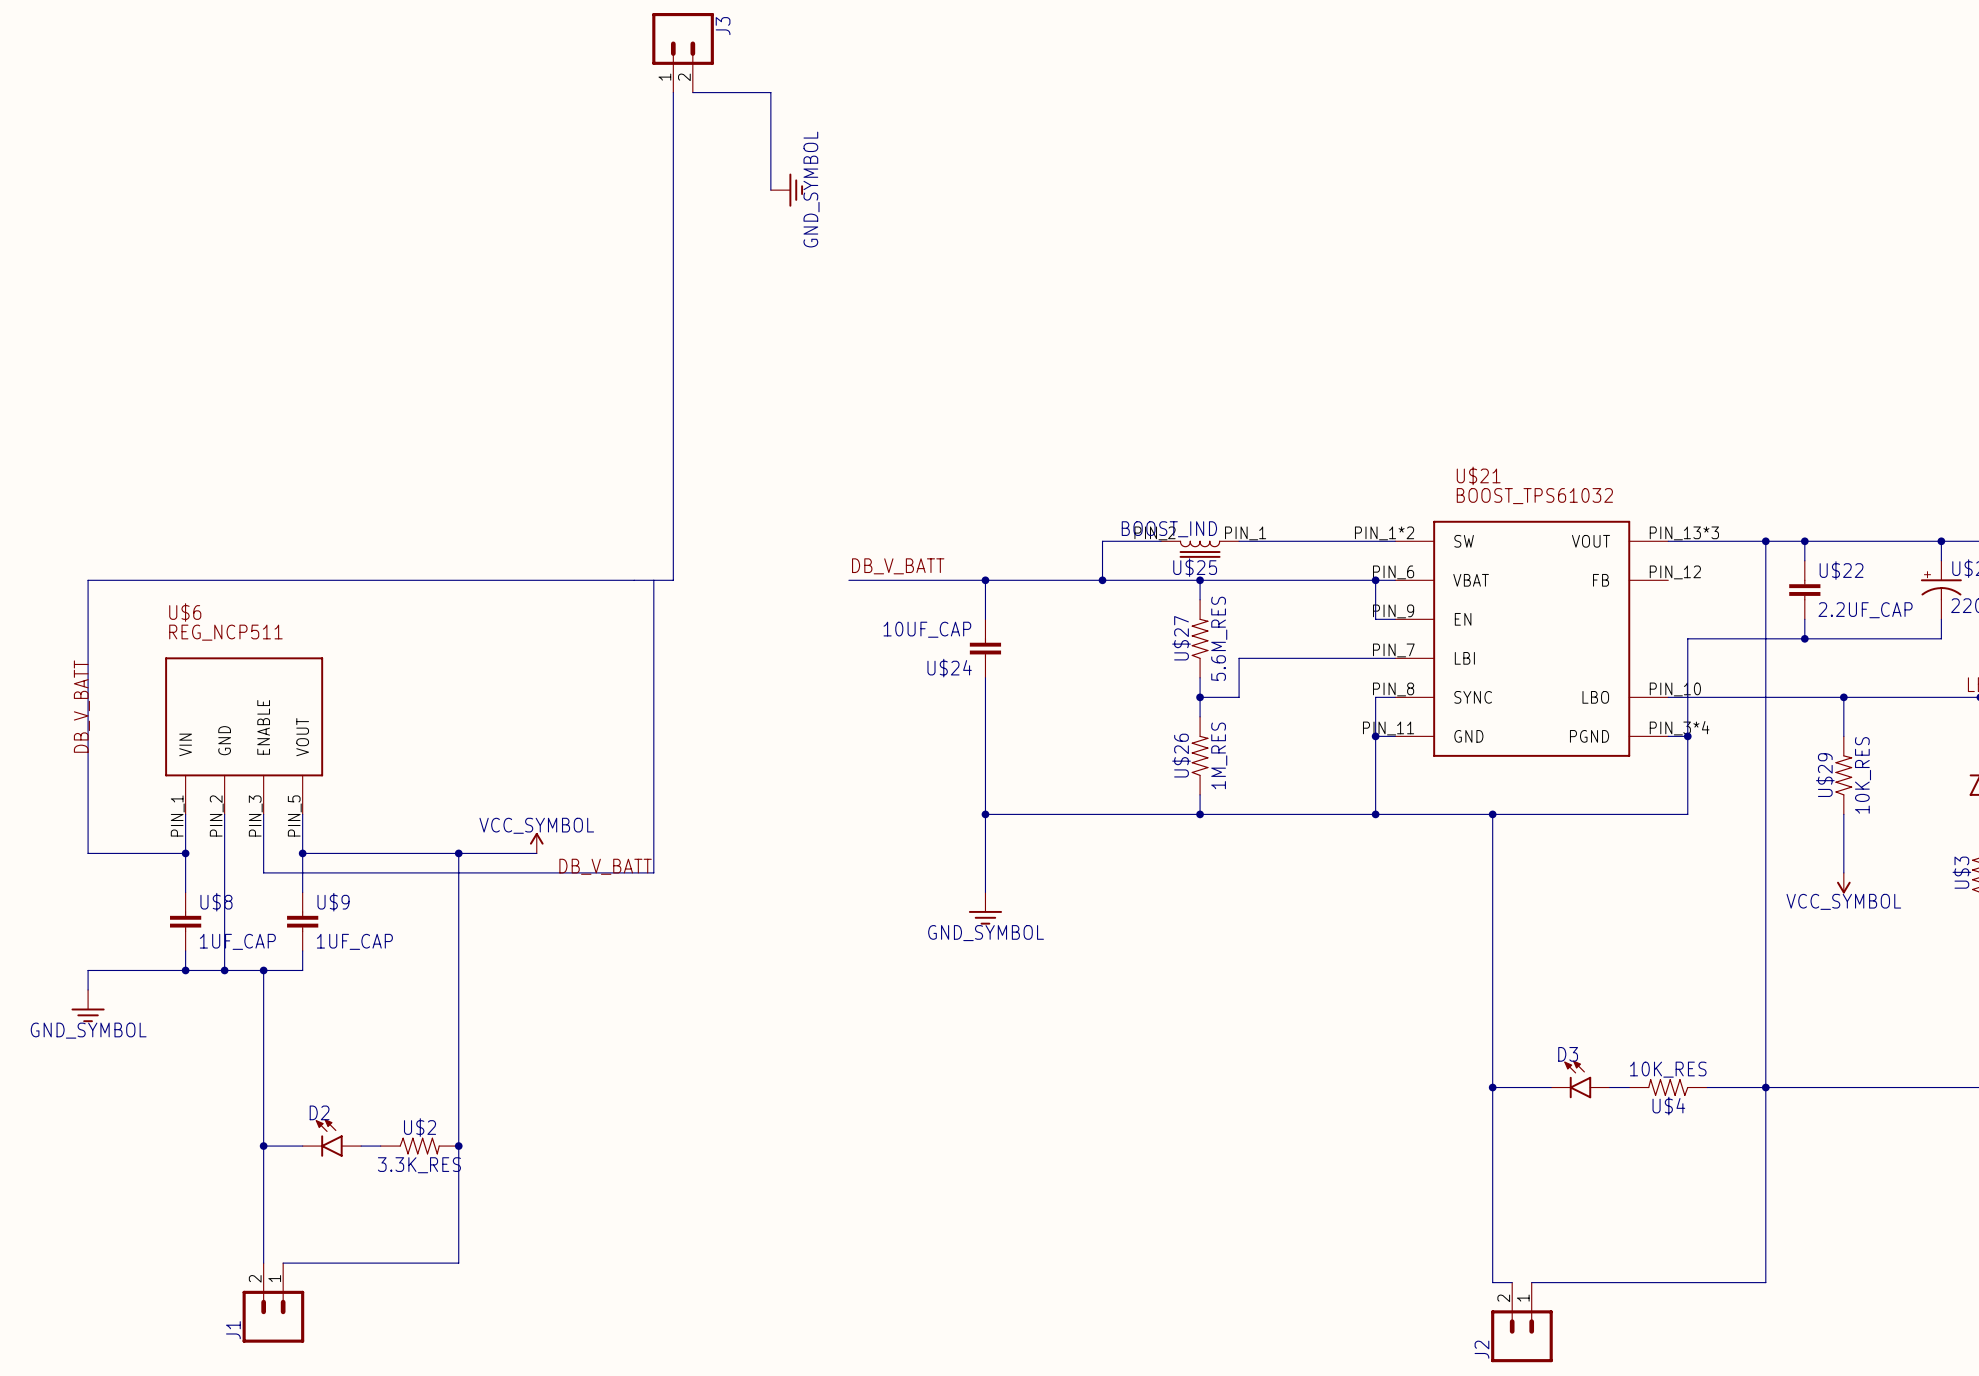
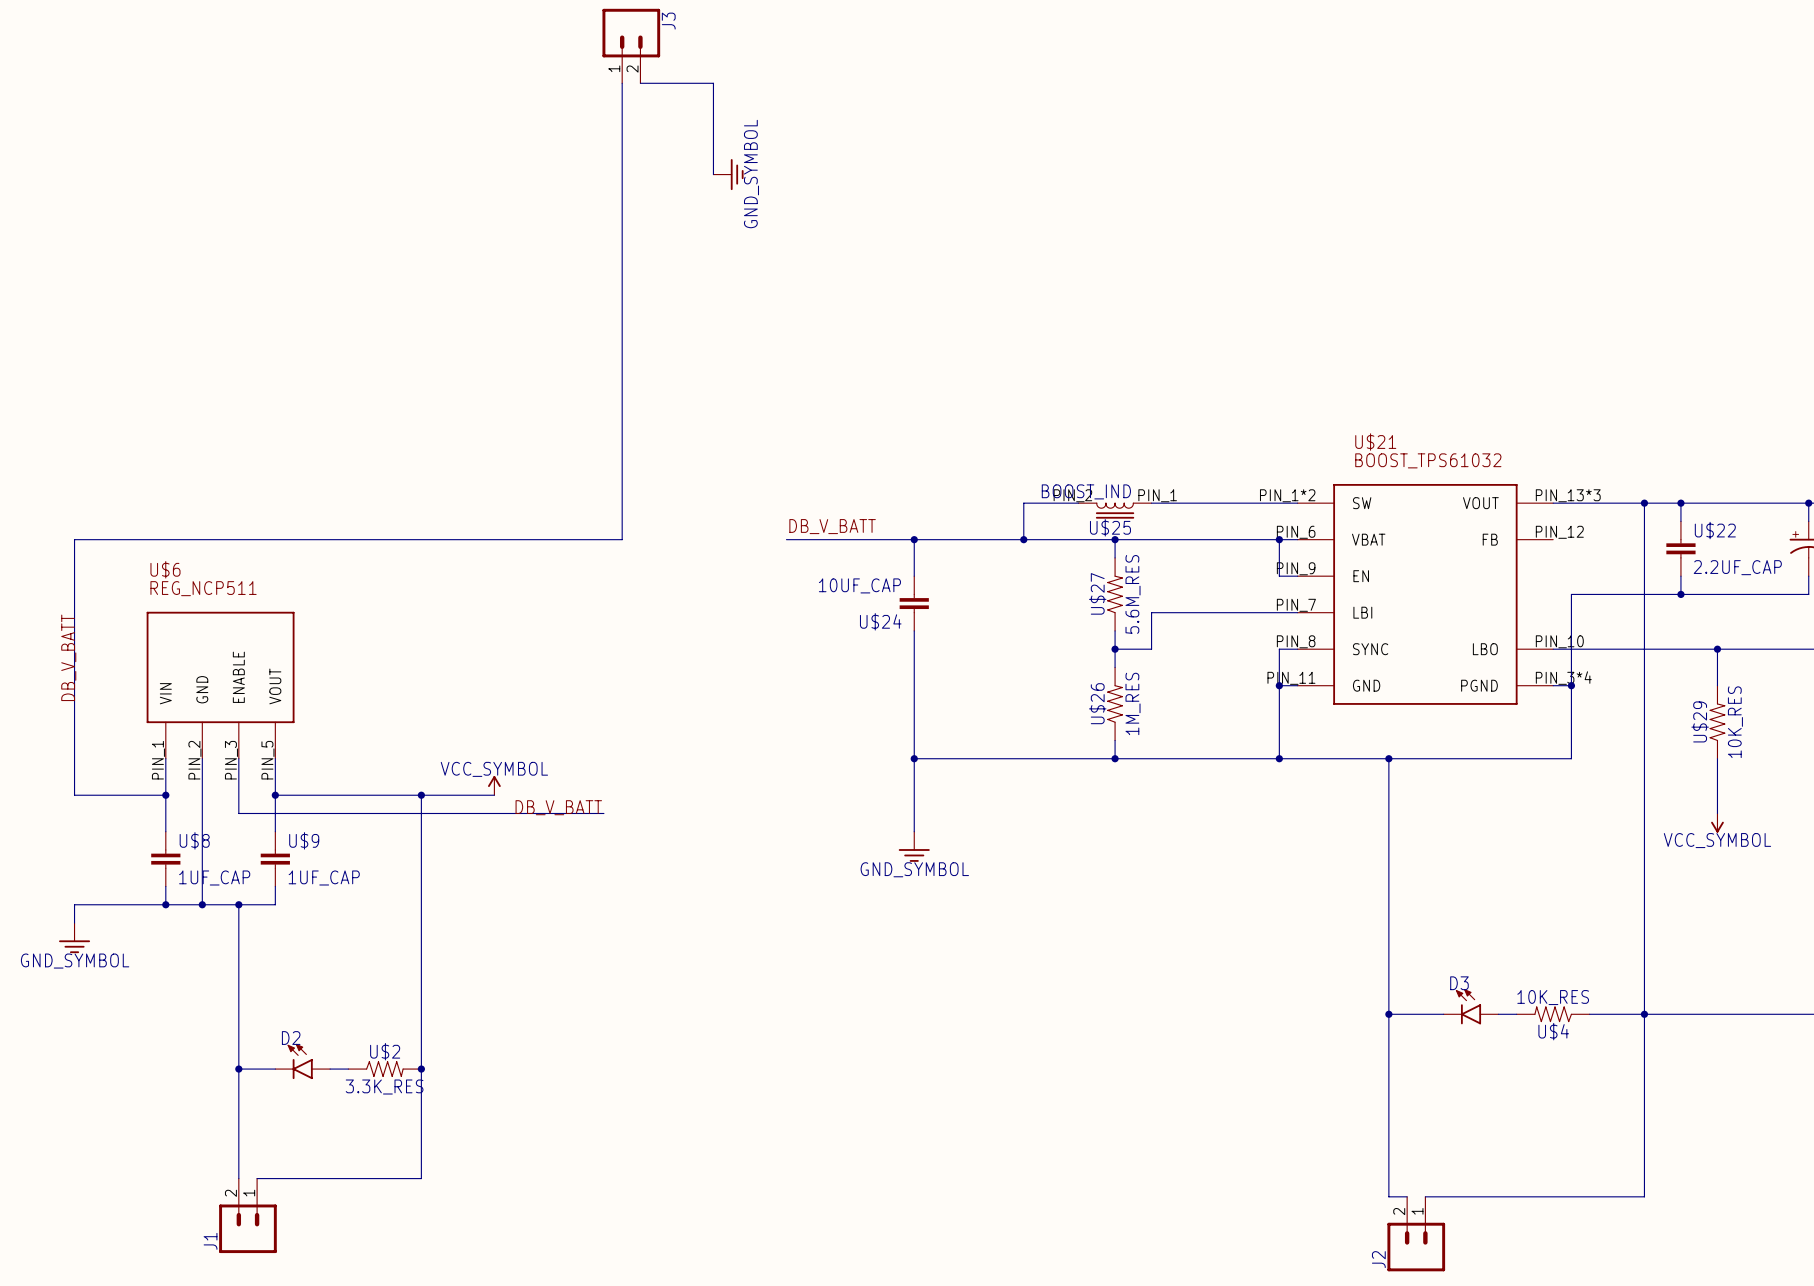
wire: (653, 580) (653, 872) -> none

